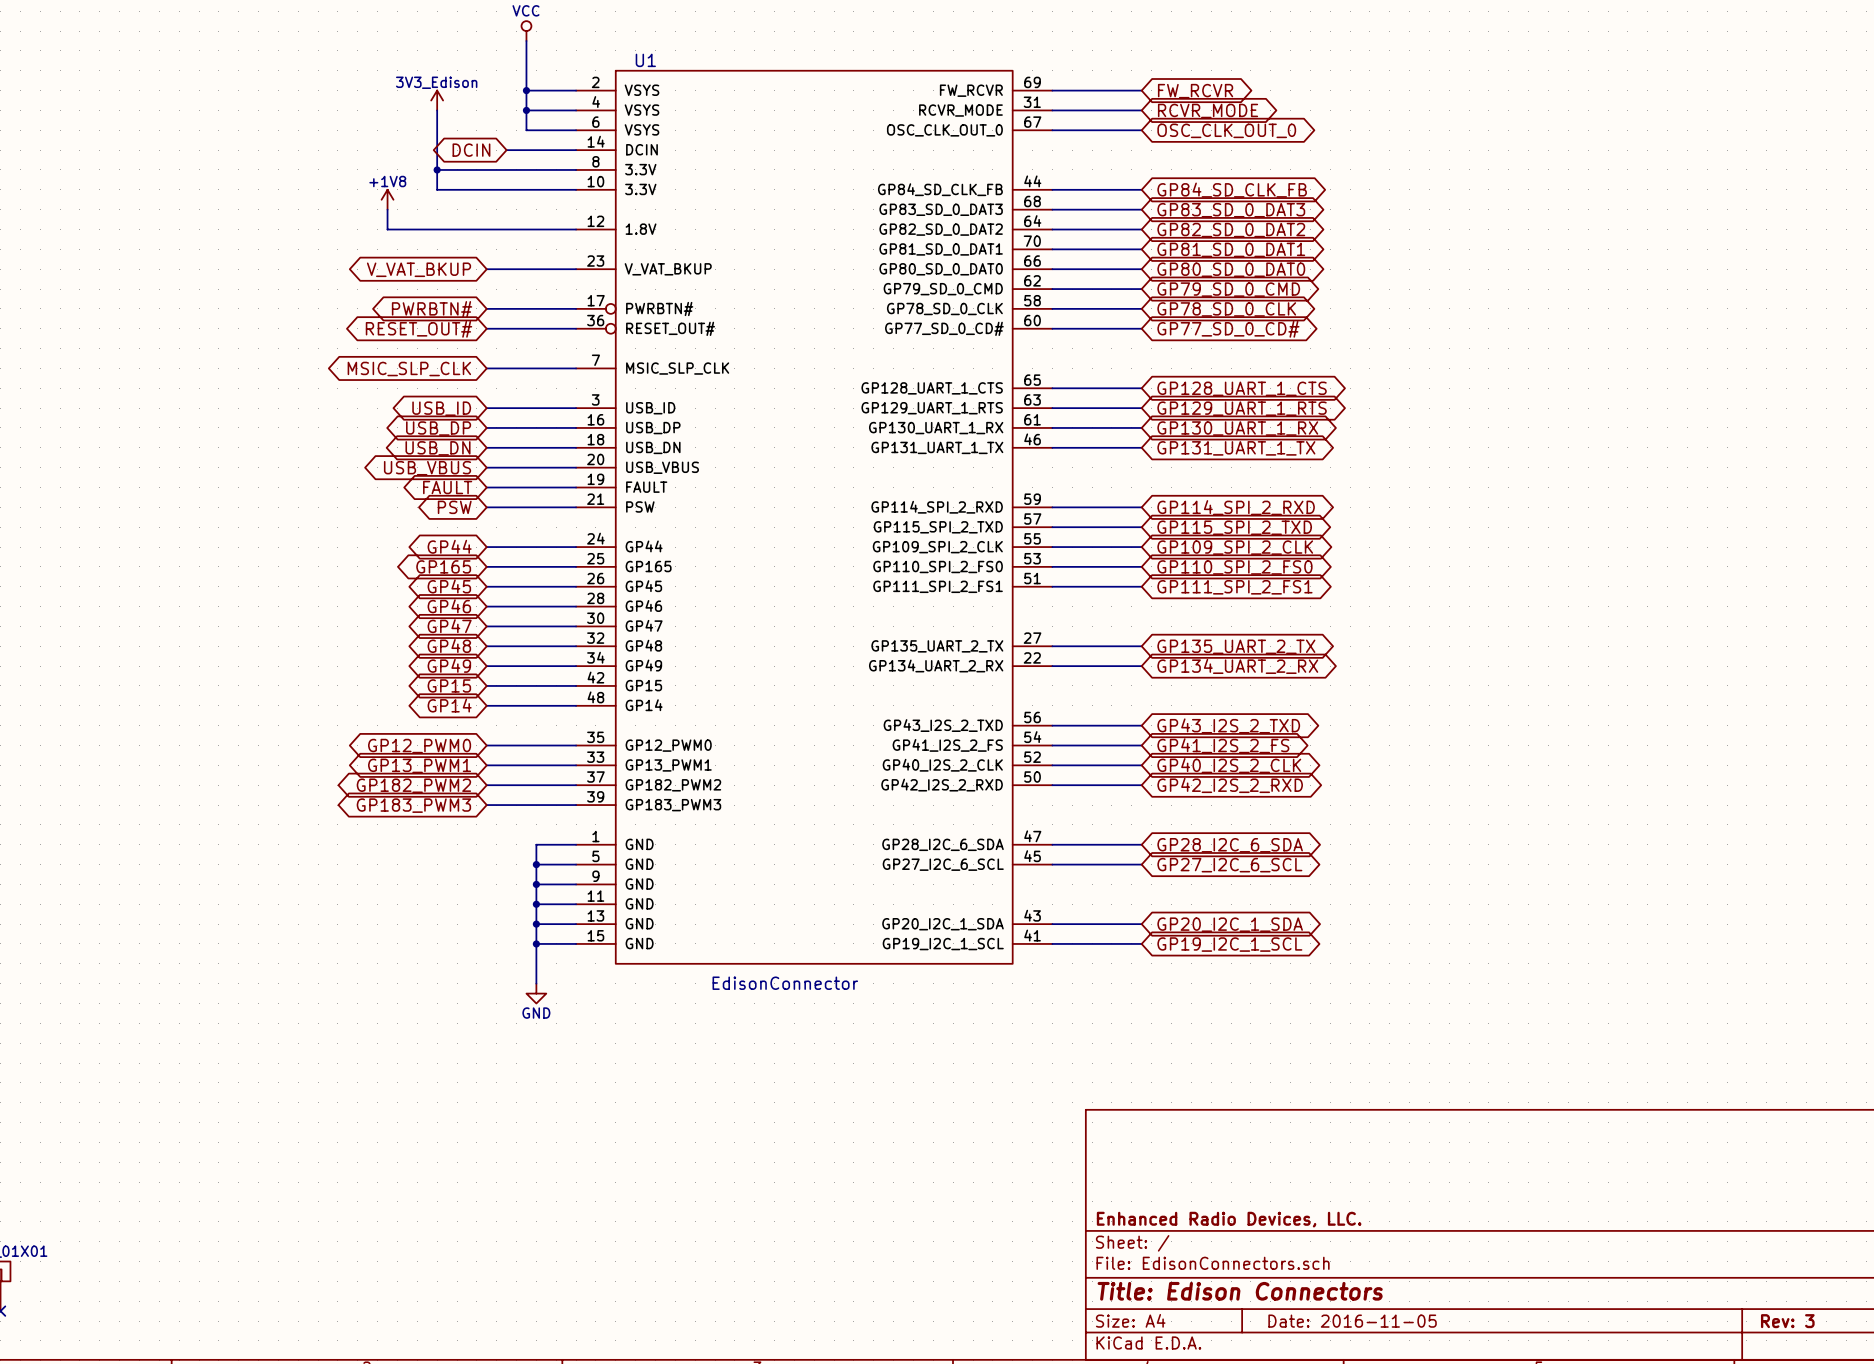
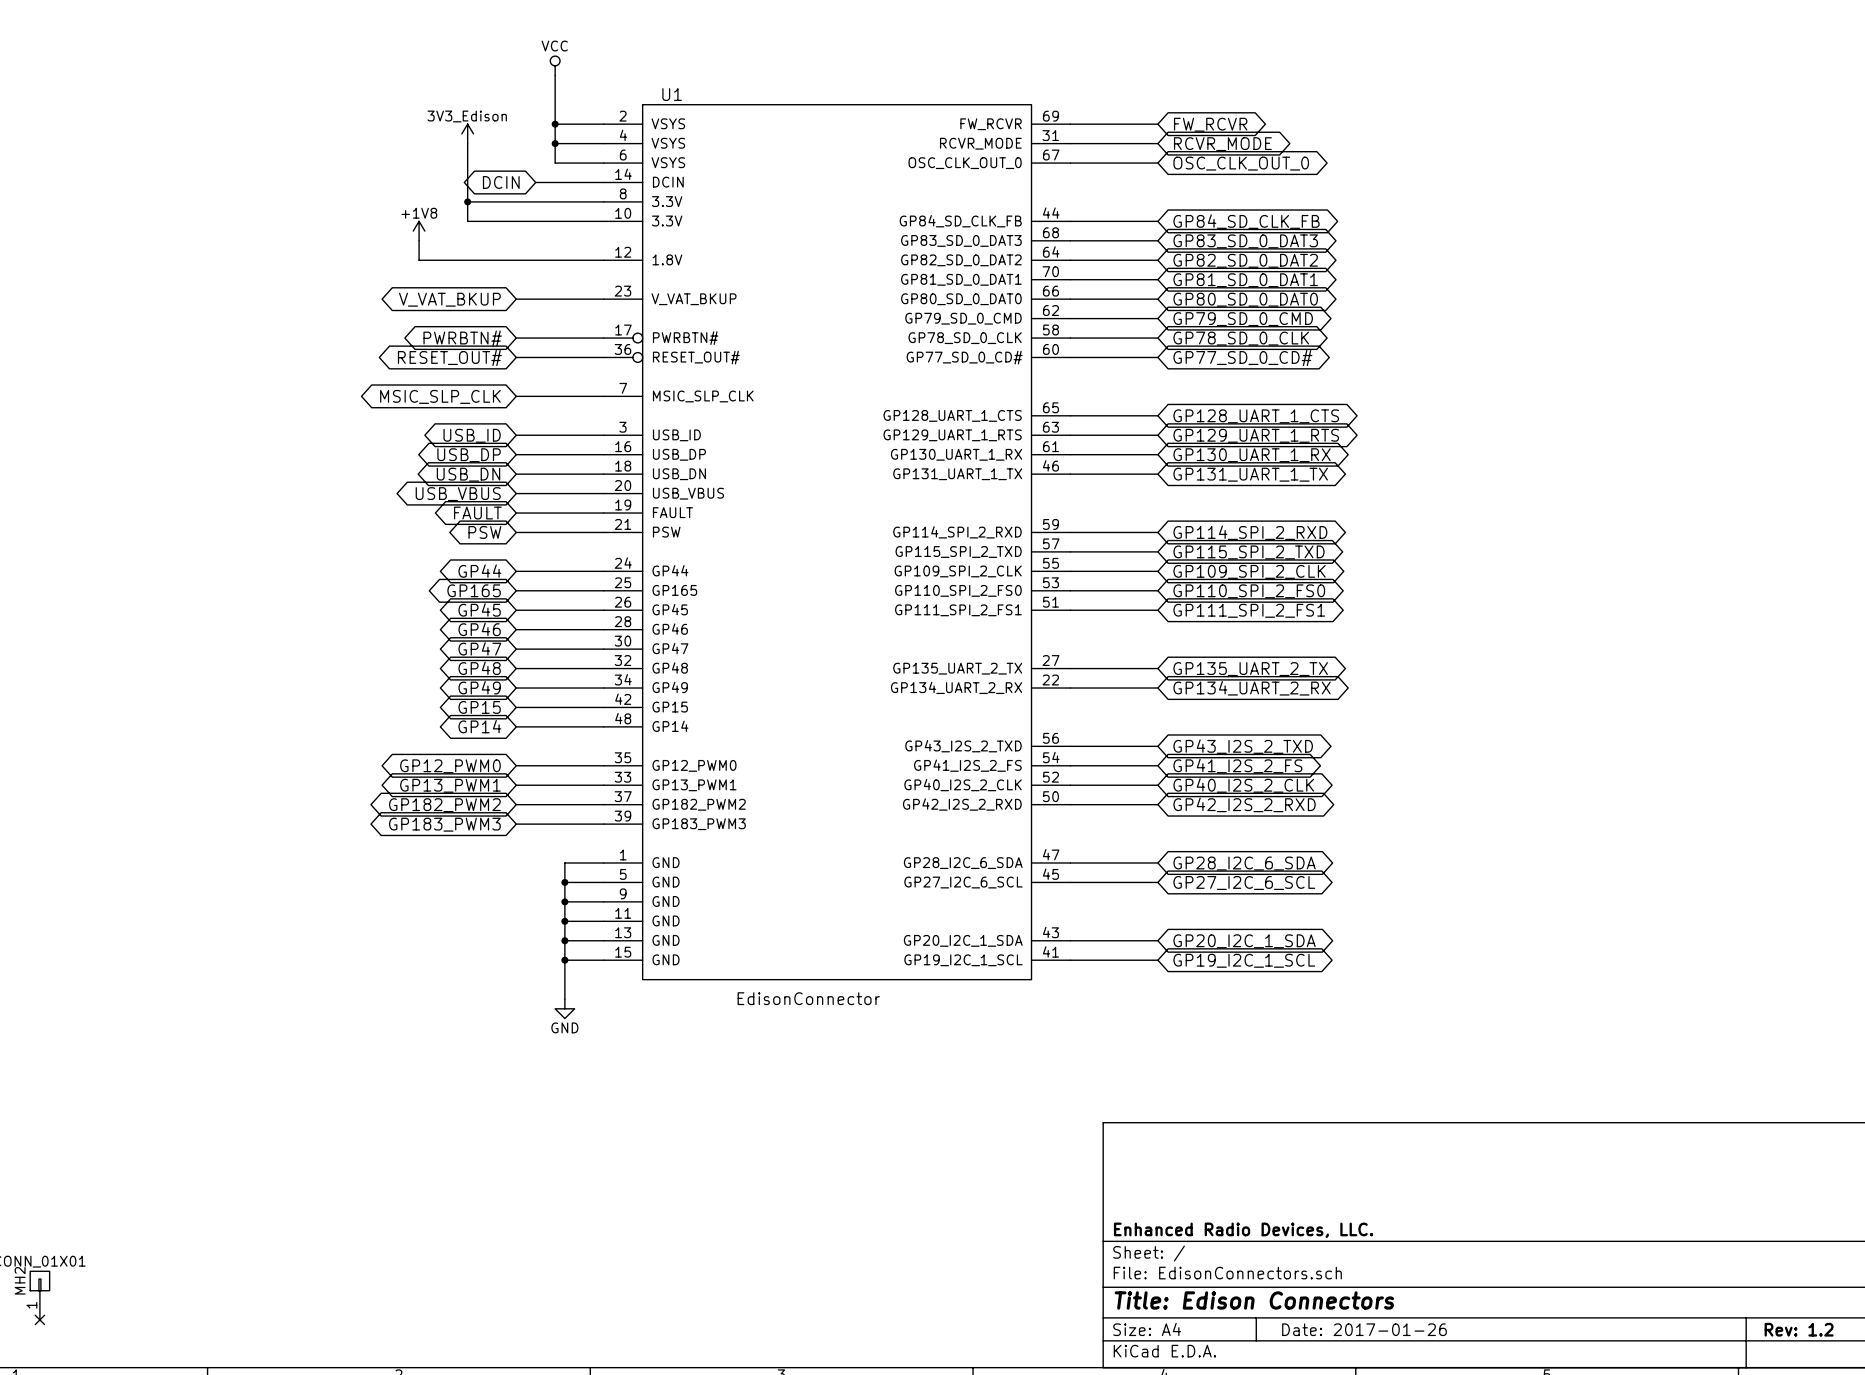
title block: Date: 2016-11-05 (1352, 1321) -> Date: 2017-01-26 (1364, 1329)
title block: Rev: 3 (1787, 1321) -> Rev: 1.2 (1799, 1329)

